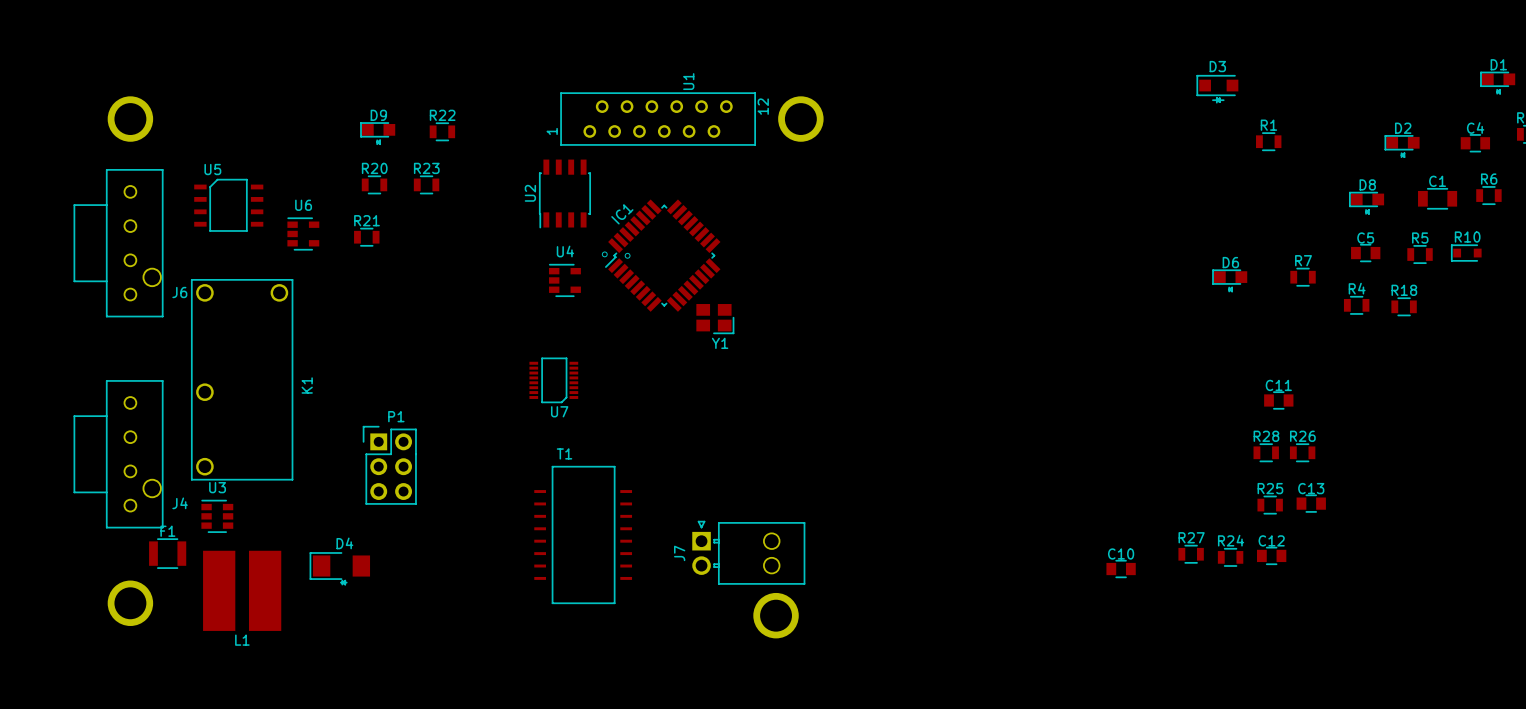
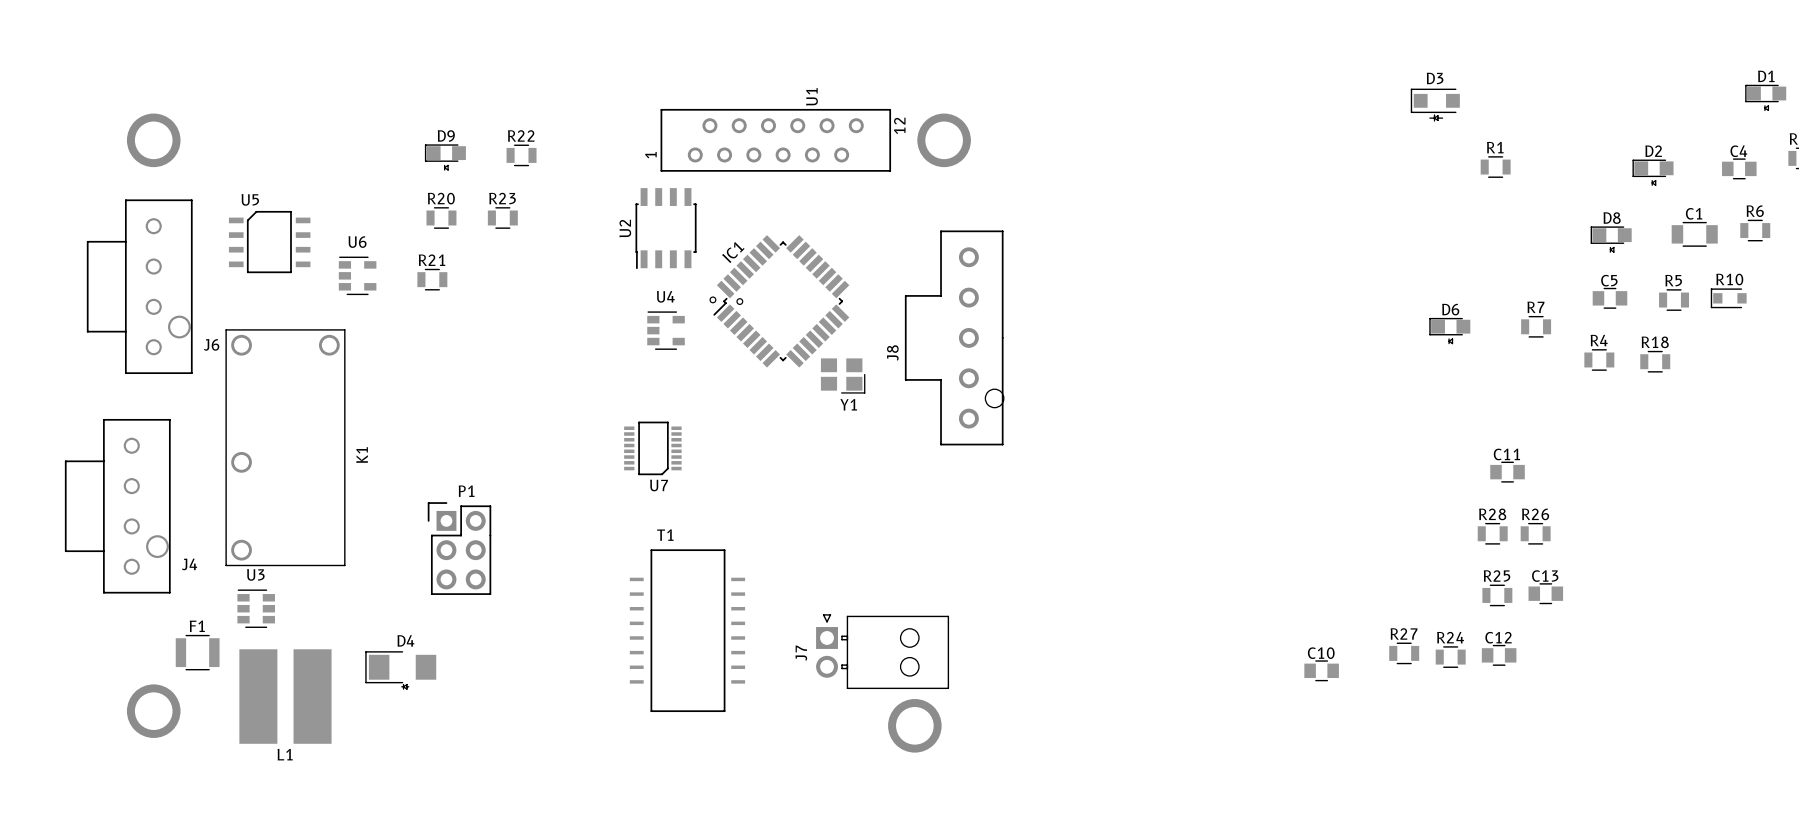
J8: none -> (954, 337)
J4 position: (118, 454) -> (117, 506)

